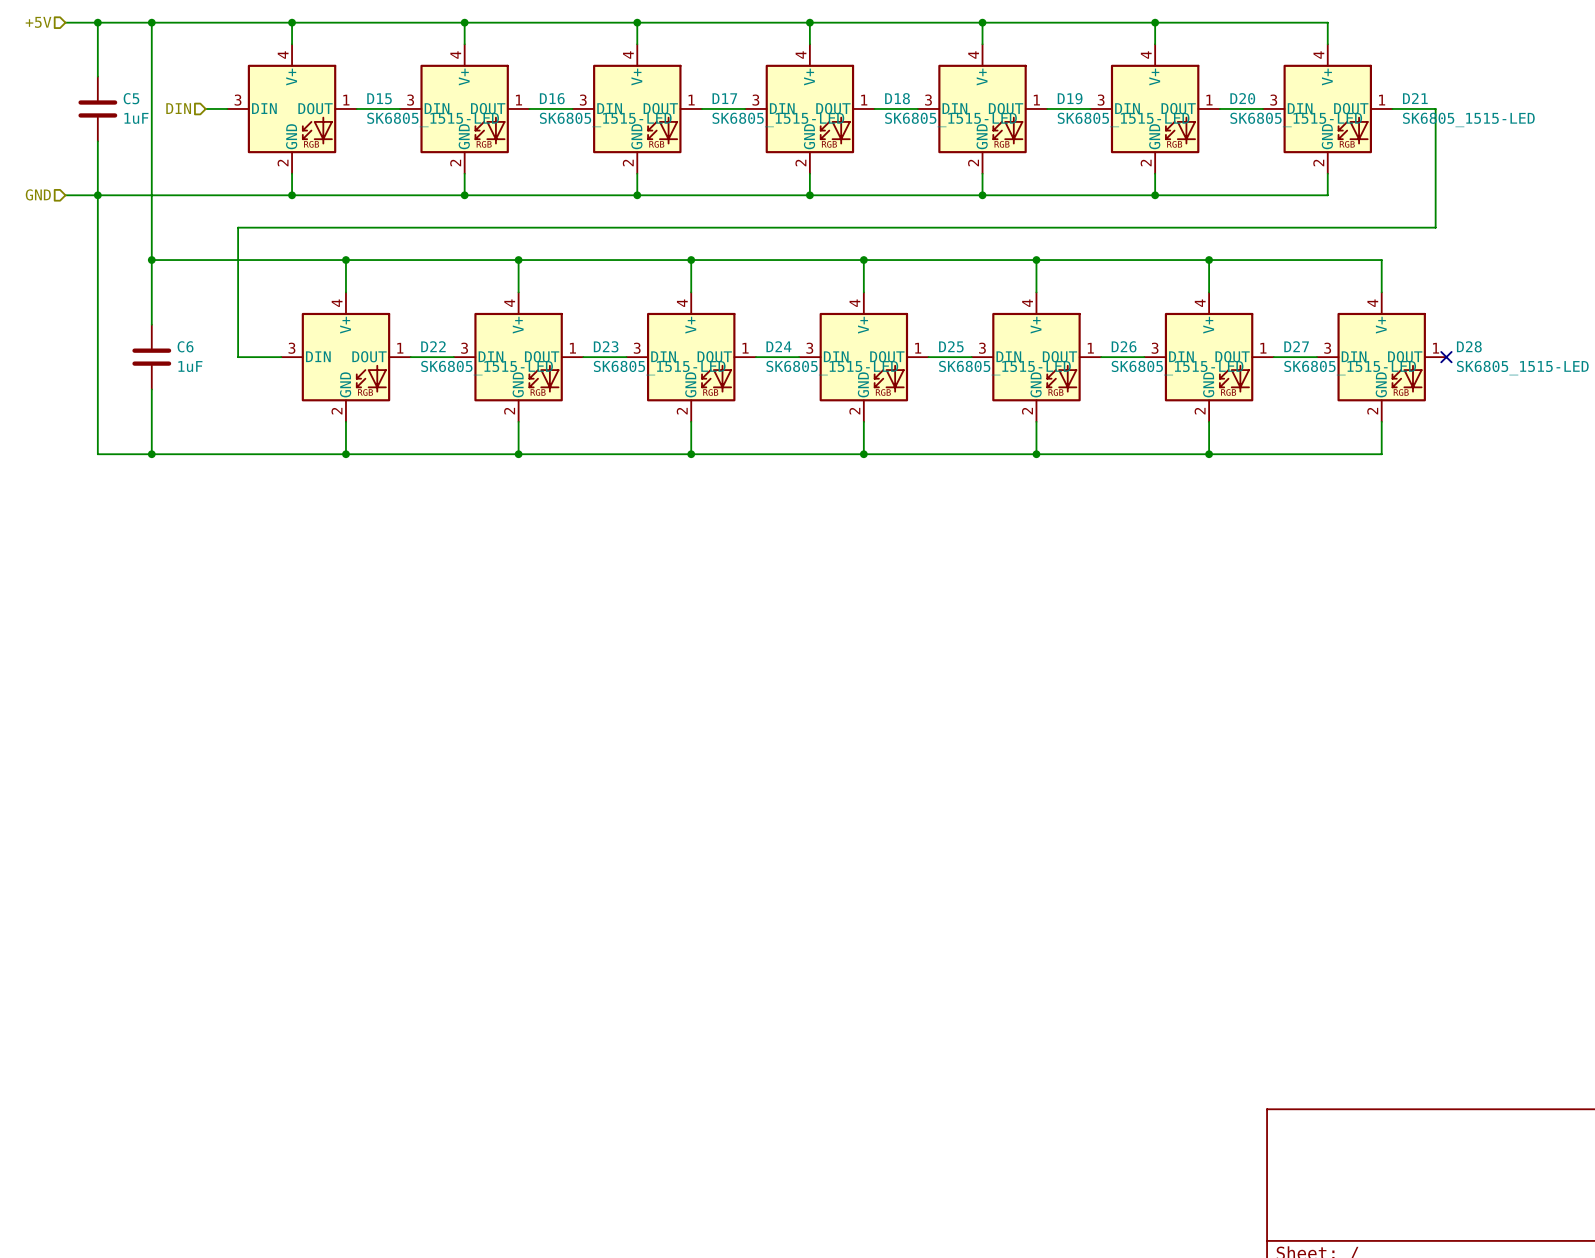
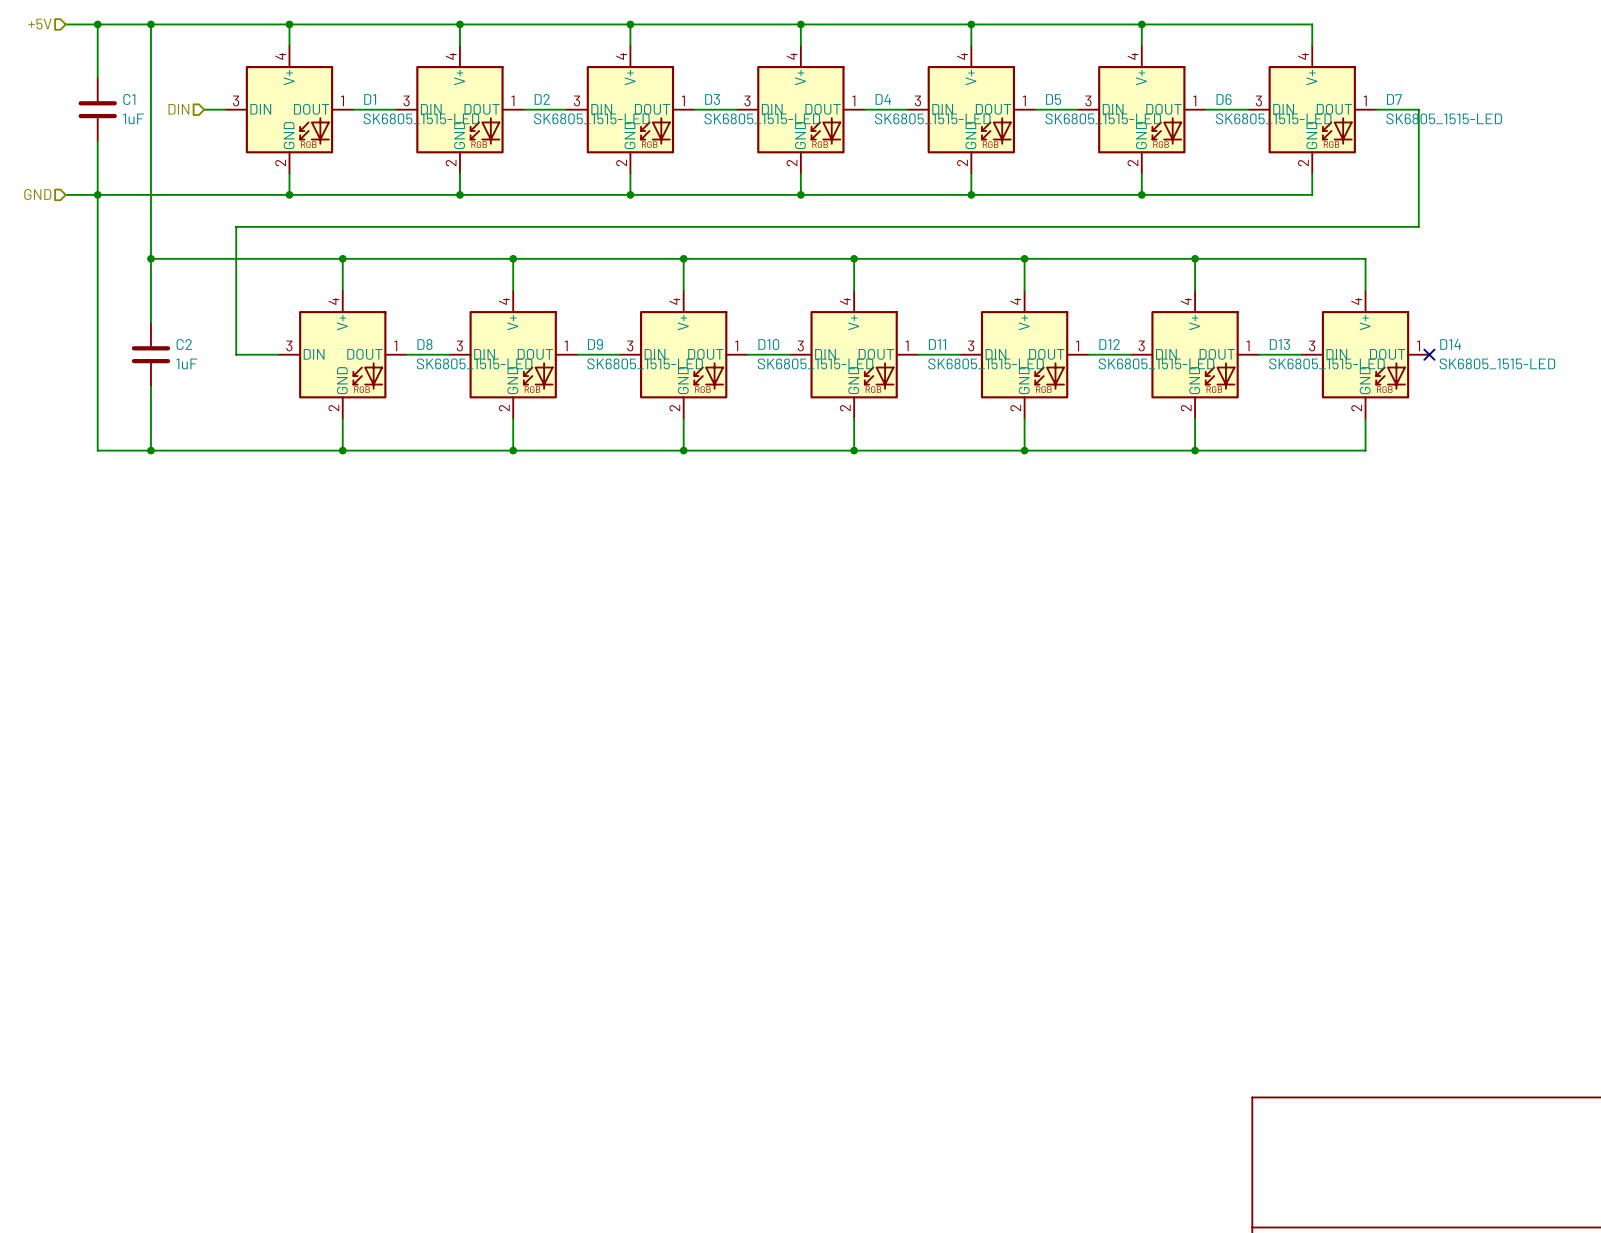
C5 name: C5 (131, 98) -> C1 (129, 99)
D15 name: D15 (379, 98) -> D1 (370, 99)
D16 name: D16 (552, 98) -> D2 (542, 99)
D17 name: D17 (724, 98) -> D3 (712, 99)
D18 name: D18 (897, 98) -> D4 (883, 99)
D19 name: D19 (1070, 98) -> D5 (1053, 99)
D20 name: D20 (1242, 98) -> D6 (1224, 99)
D21 name: D21 (1415, 98) -> D7 (1394, 99)
C6 name: C6 (185, 346) -> C2 (184, 344)
D22 name: D22 (433, 346) -> D8 (424, 344)
D23 name: D23 (606, 346) -> D9 (595, 344)
D24 name: D24 (778, 346) -> D10 (768, 344)
D25 name: D25 (951, 346) -> D11 (937, 344)
D26 name: D26 (1124, 346) -> D12 (1109, 344)
D27 name: D27 (1296, 346) -> D13 (1279, 344)
D28 name: D28 (1469, 346) -> D14 (1450, 344)

